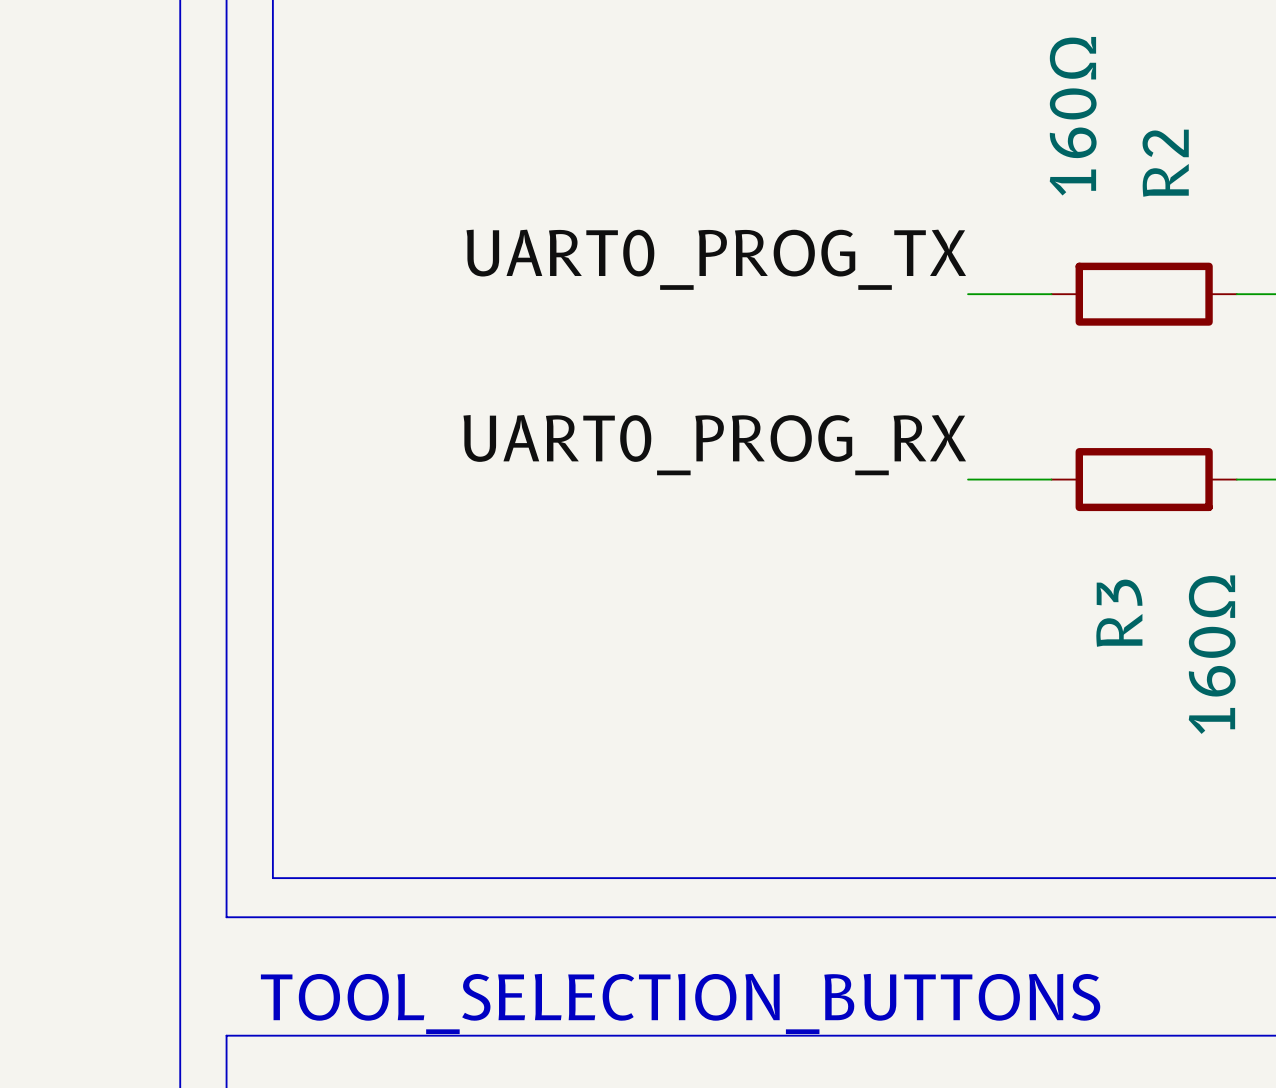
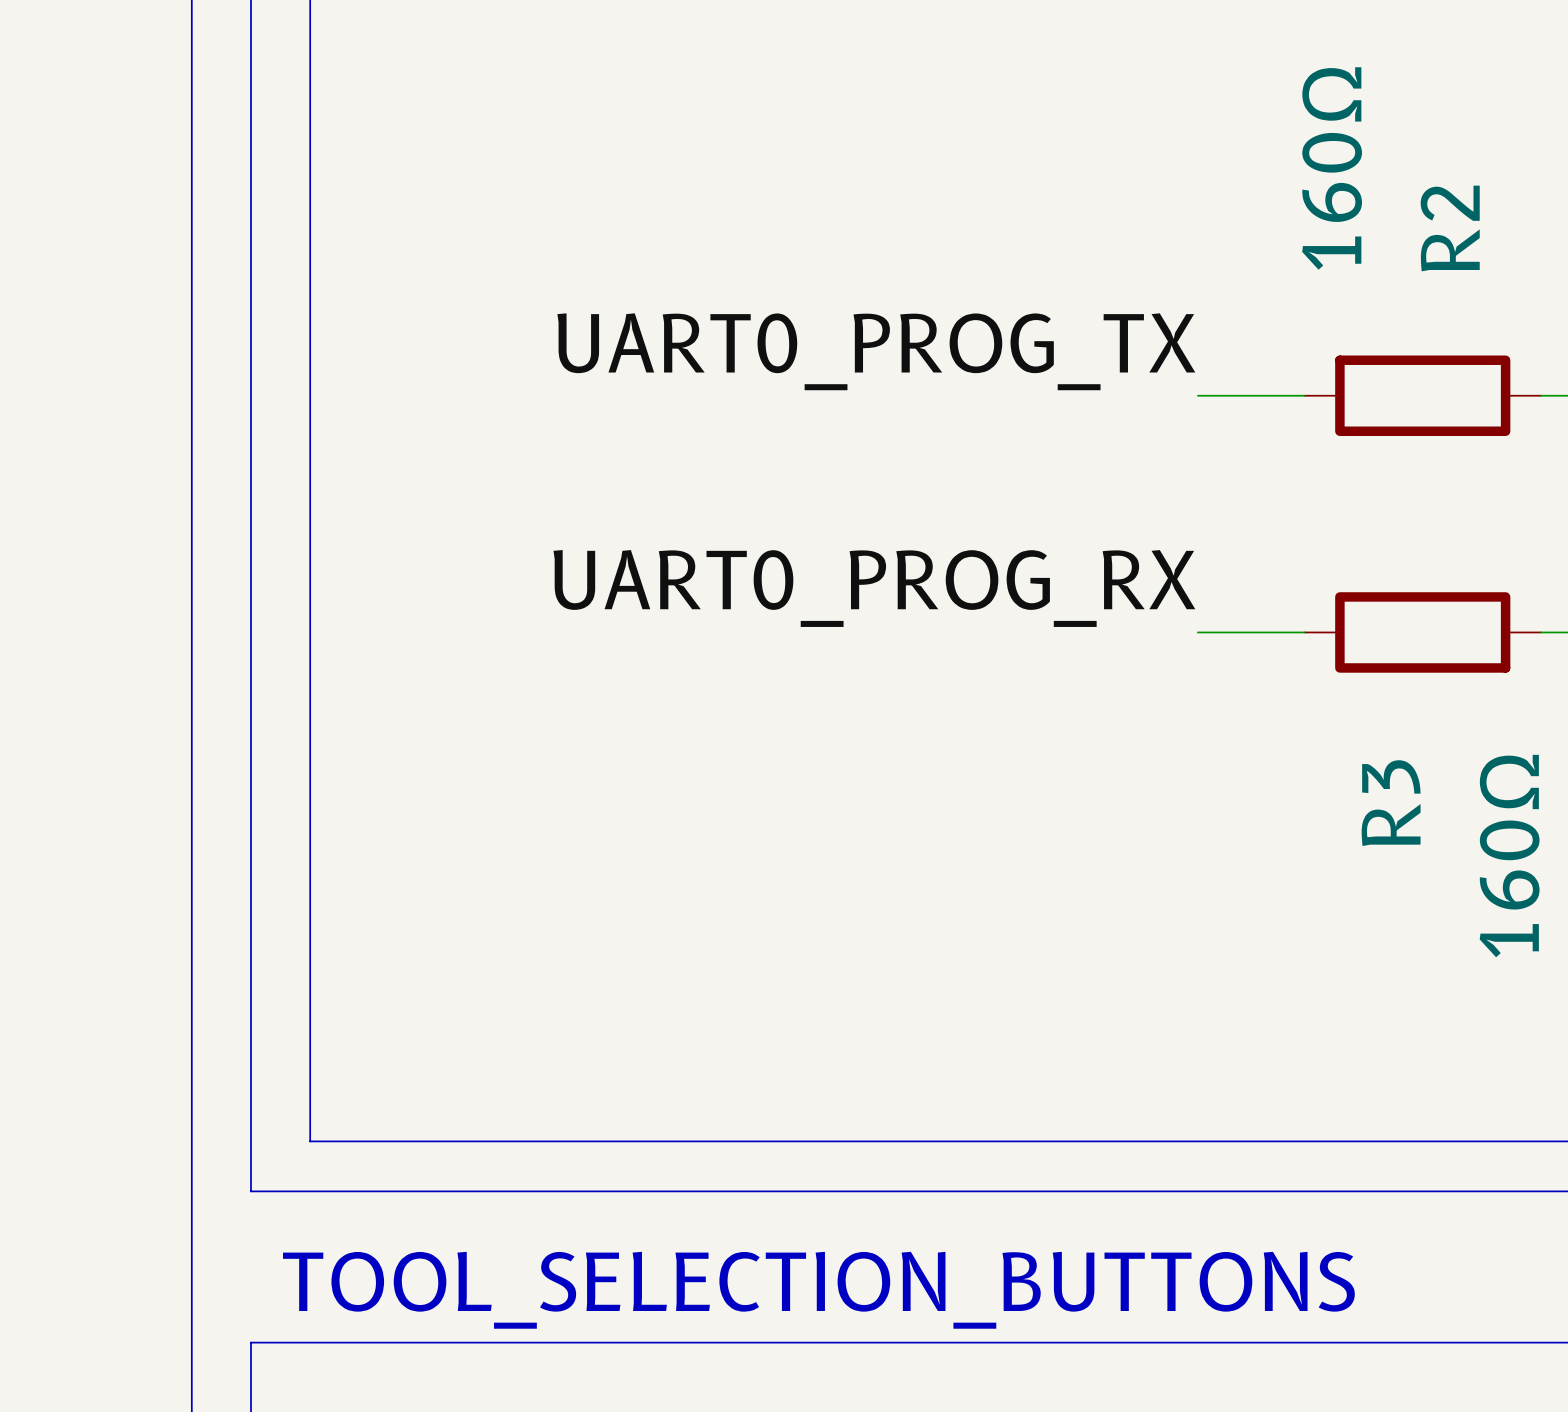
text position: TOOL_SELECTION_BUTTONS (680, 1003) -> TOOL_SELECTION_BUTTONS (818, 1290)

